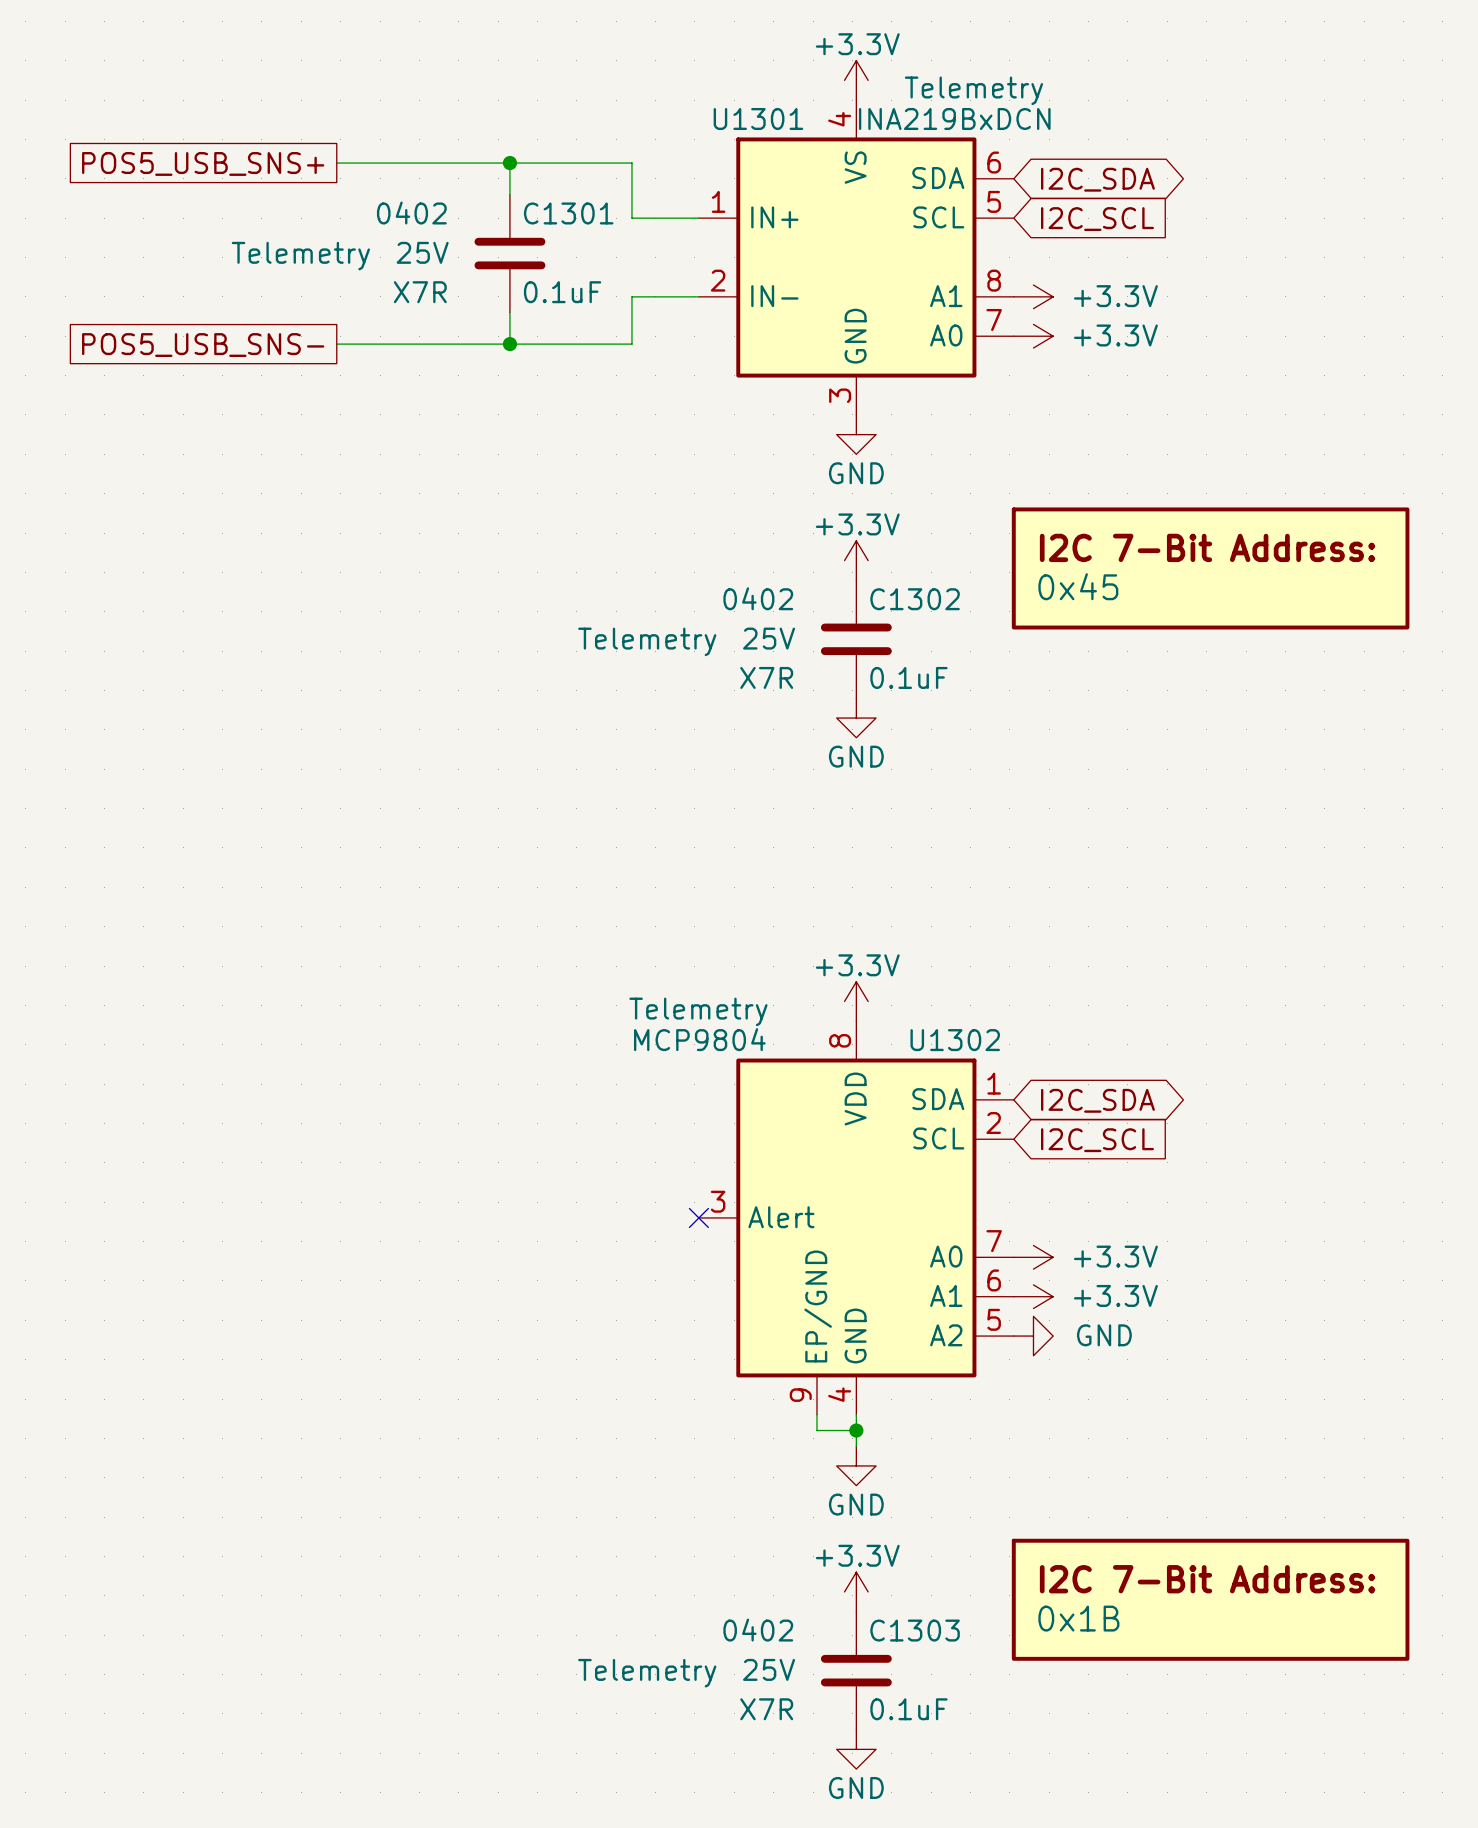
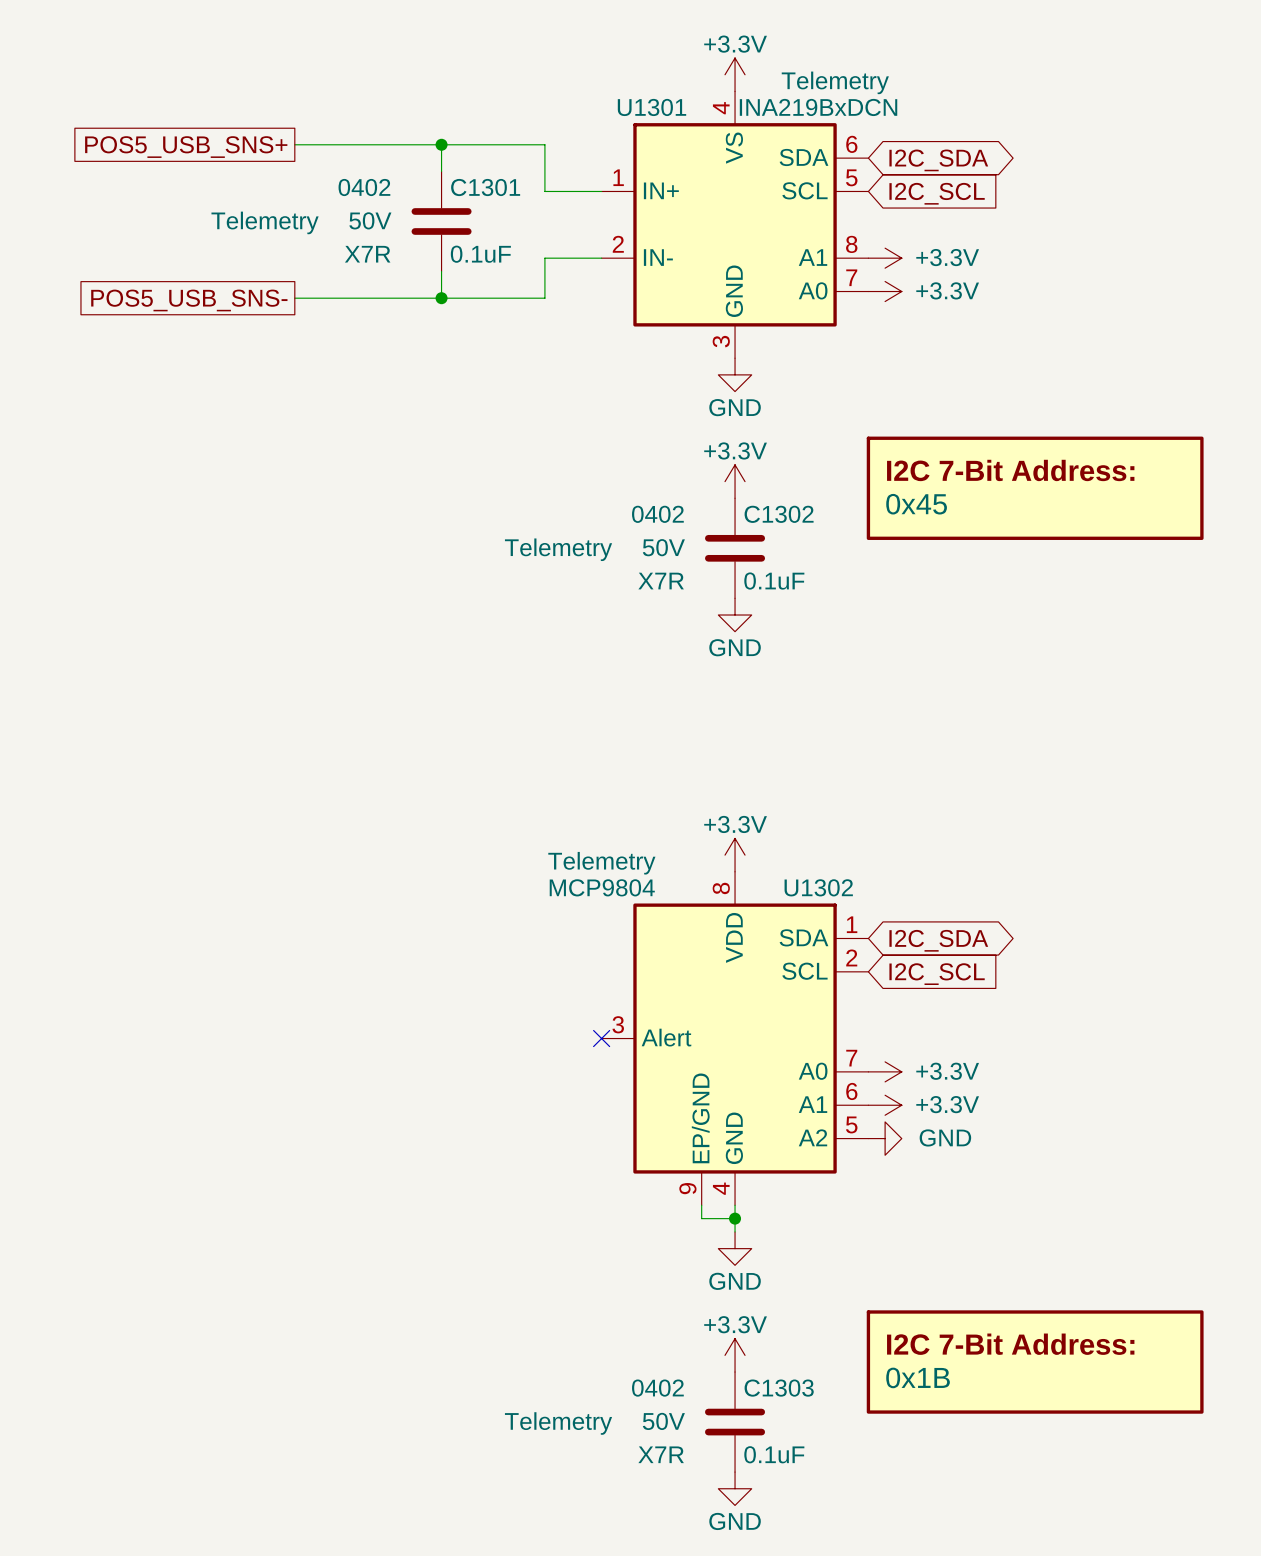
C1301 text: 25V (422, 252) -> 50V (370, 220)
C1302 text: 25V (769, 638) -> 50V (663, 547)
C1303 text: 25V (769, 1669) -> 50V (663, 1421)

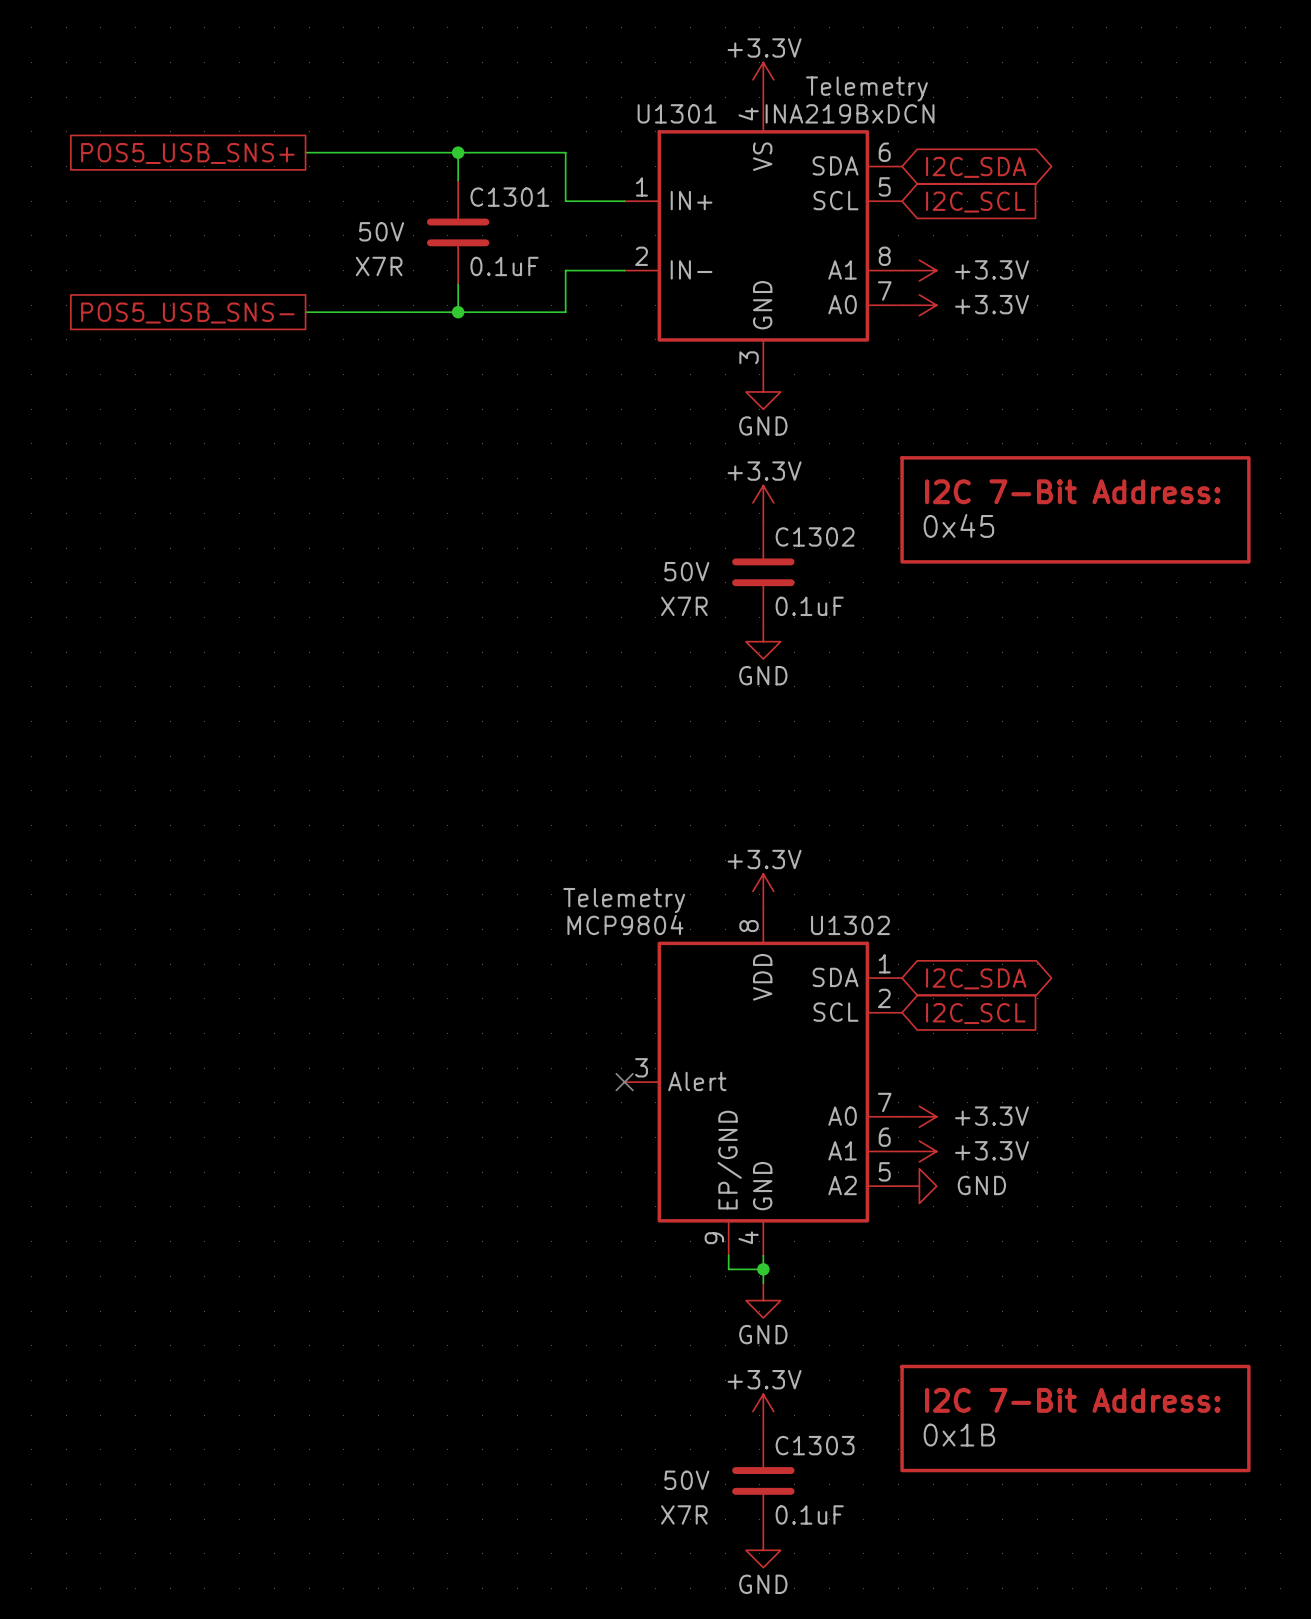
C1301 text: 0402 (364, 187) -> none
C1301 text: Telemetry (265, 222) -> none
C1302 text: 0402 (657, 514) -> none
C1302 text: Telemetry (558, 549) -> none
C1303 text: 0402 (657, 1388) -> none
C1303 text: Telemetry (558, 1423) -> none

